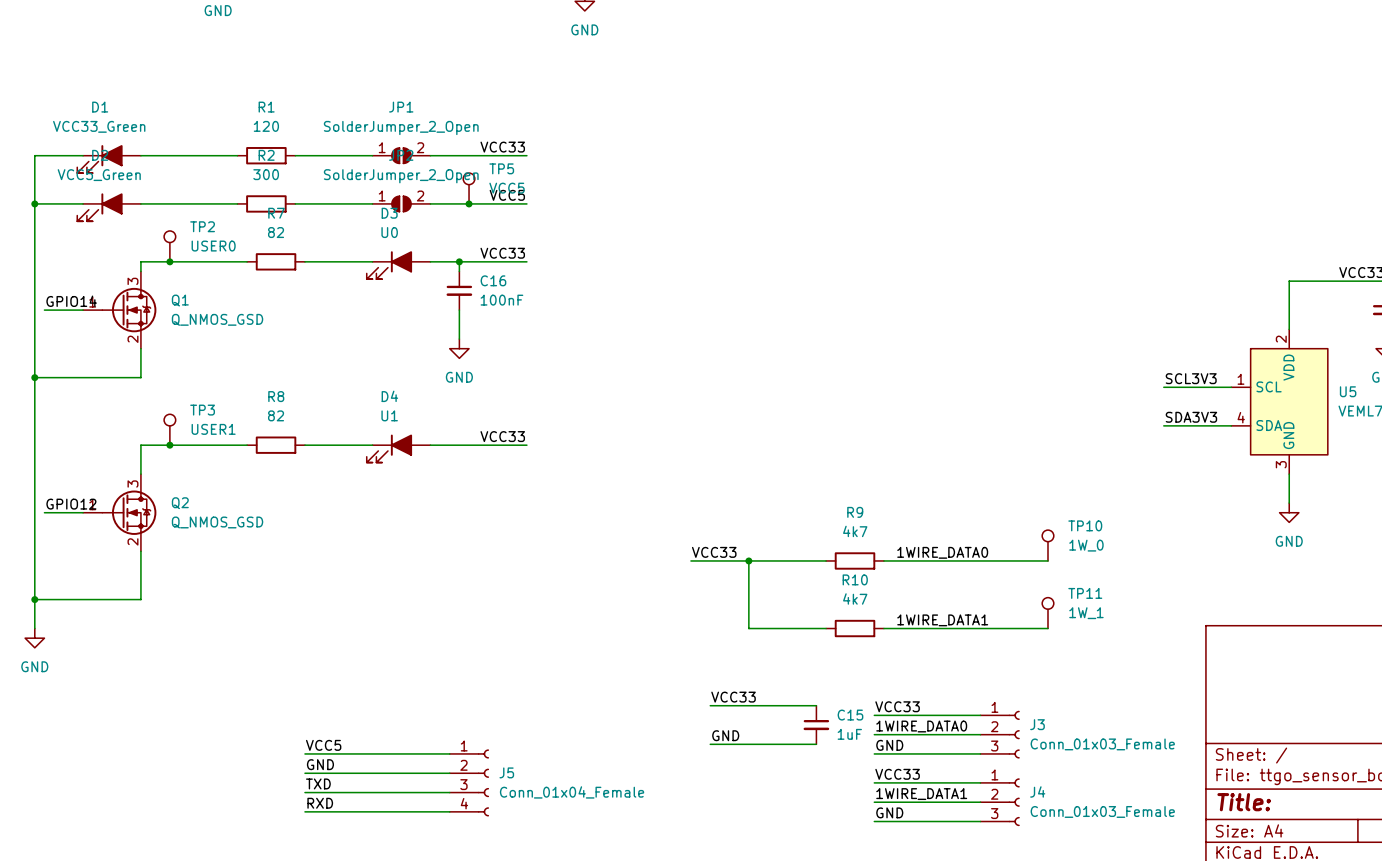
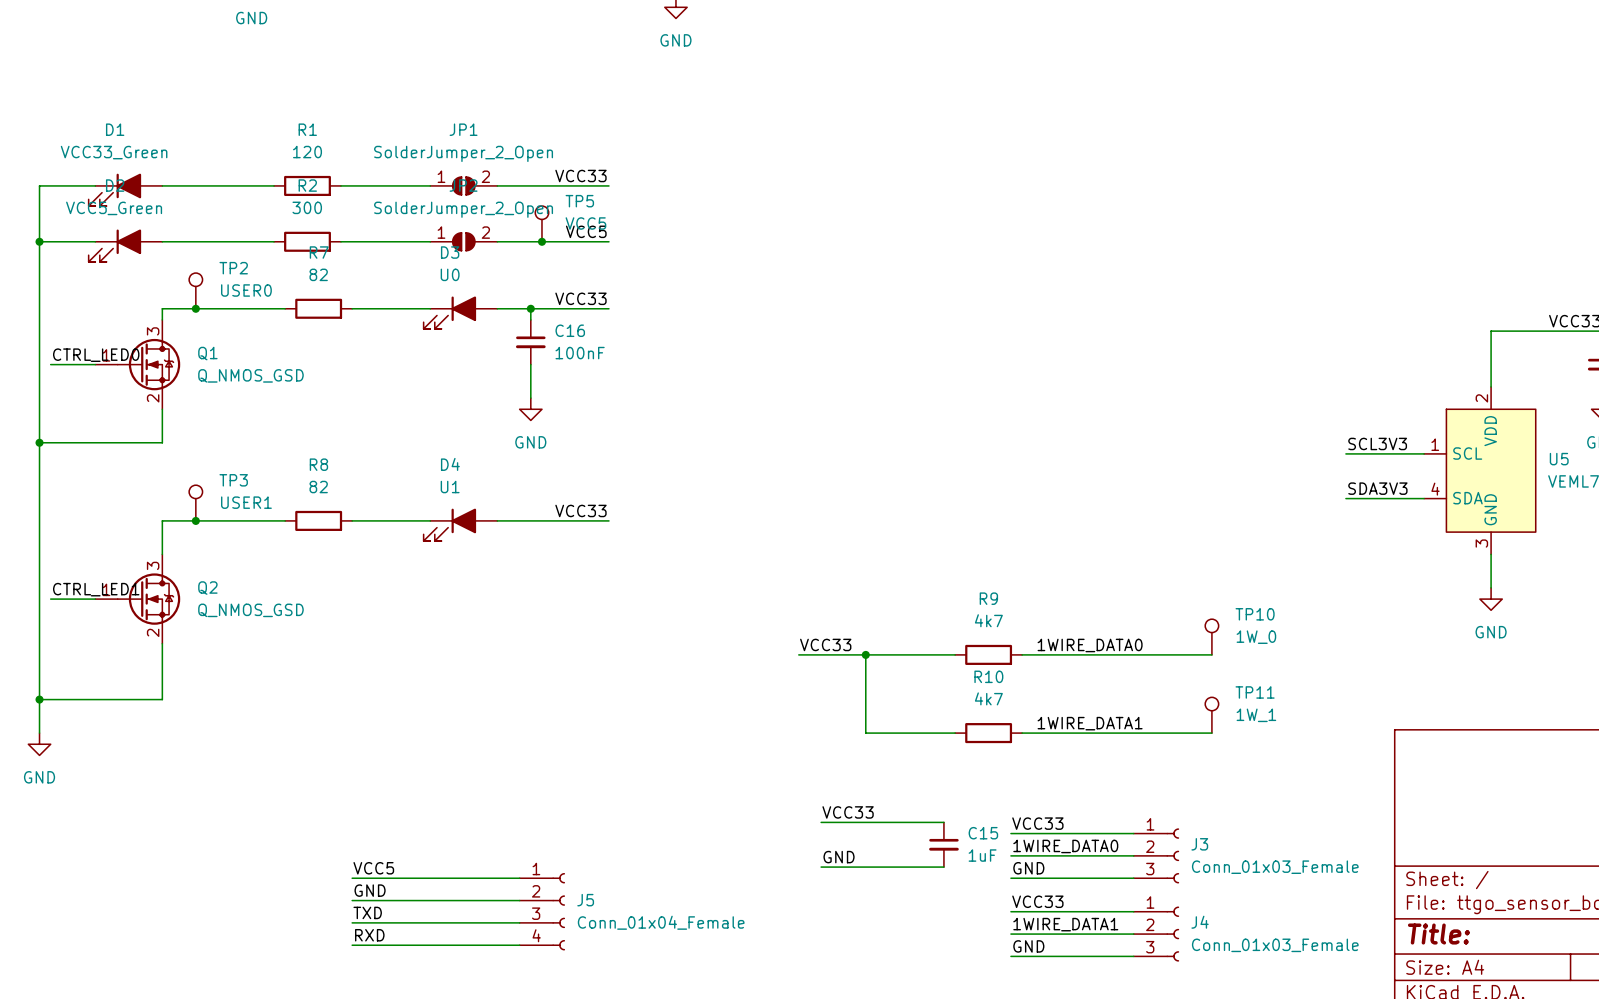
label: GPIO14 (71, 301) -> CTRL_LED0 (96, 355)
label: GPIO12 (71, 504) -> CTRL_LED1 (96, 589)

